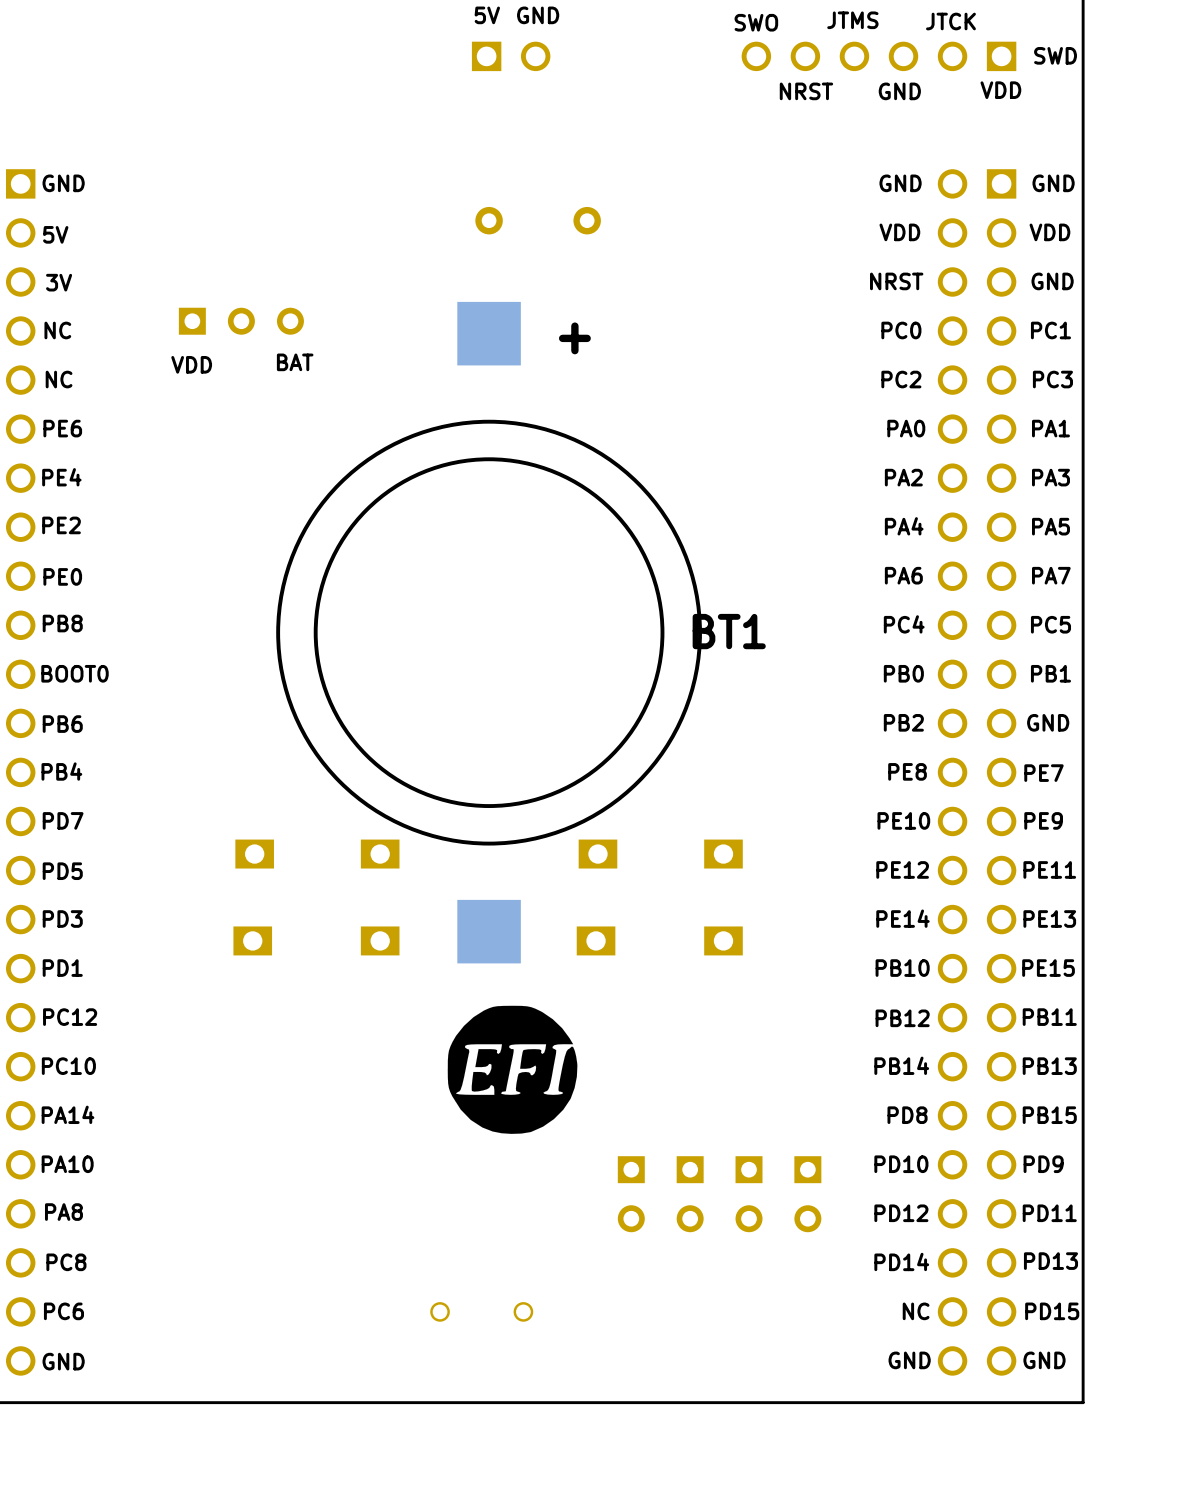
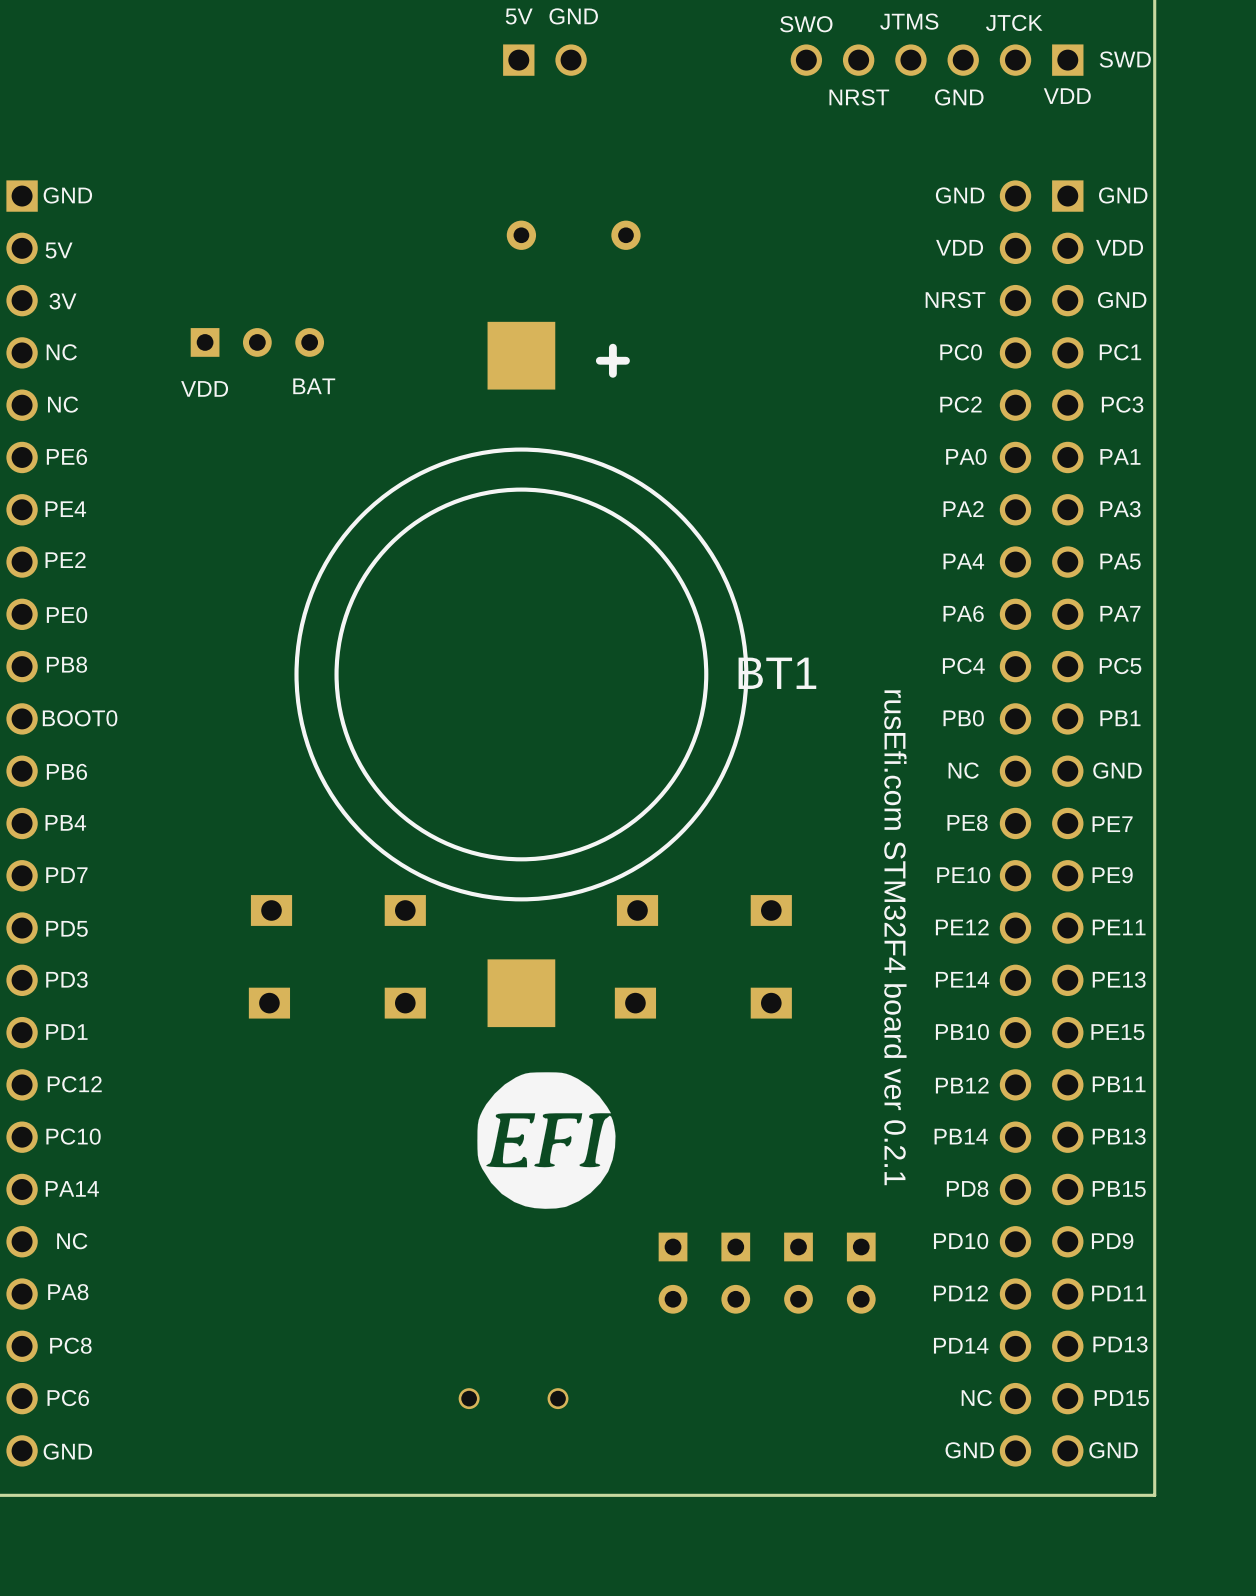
text: PB2 (903, 722) -> NC (963, 770)
text: none -> rusEfi.com STM32F4 board ver 0.2.1 (895, 937)
text: PA10 (67, 1164) -> NC (72, 1241)

